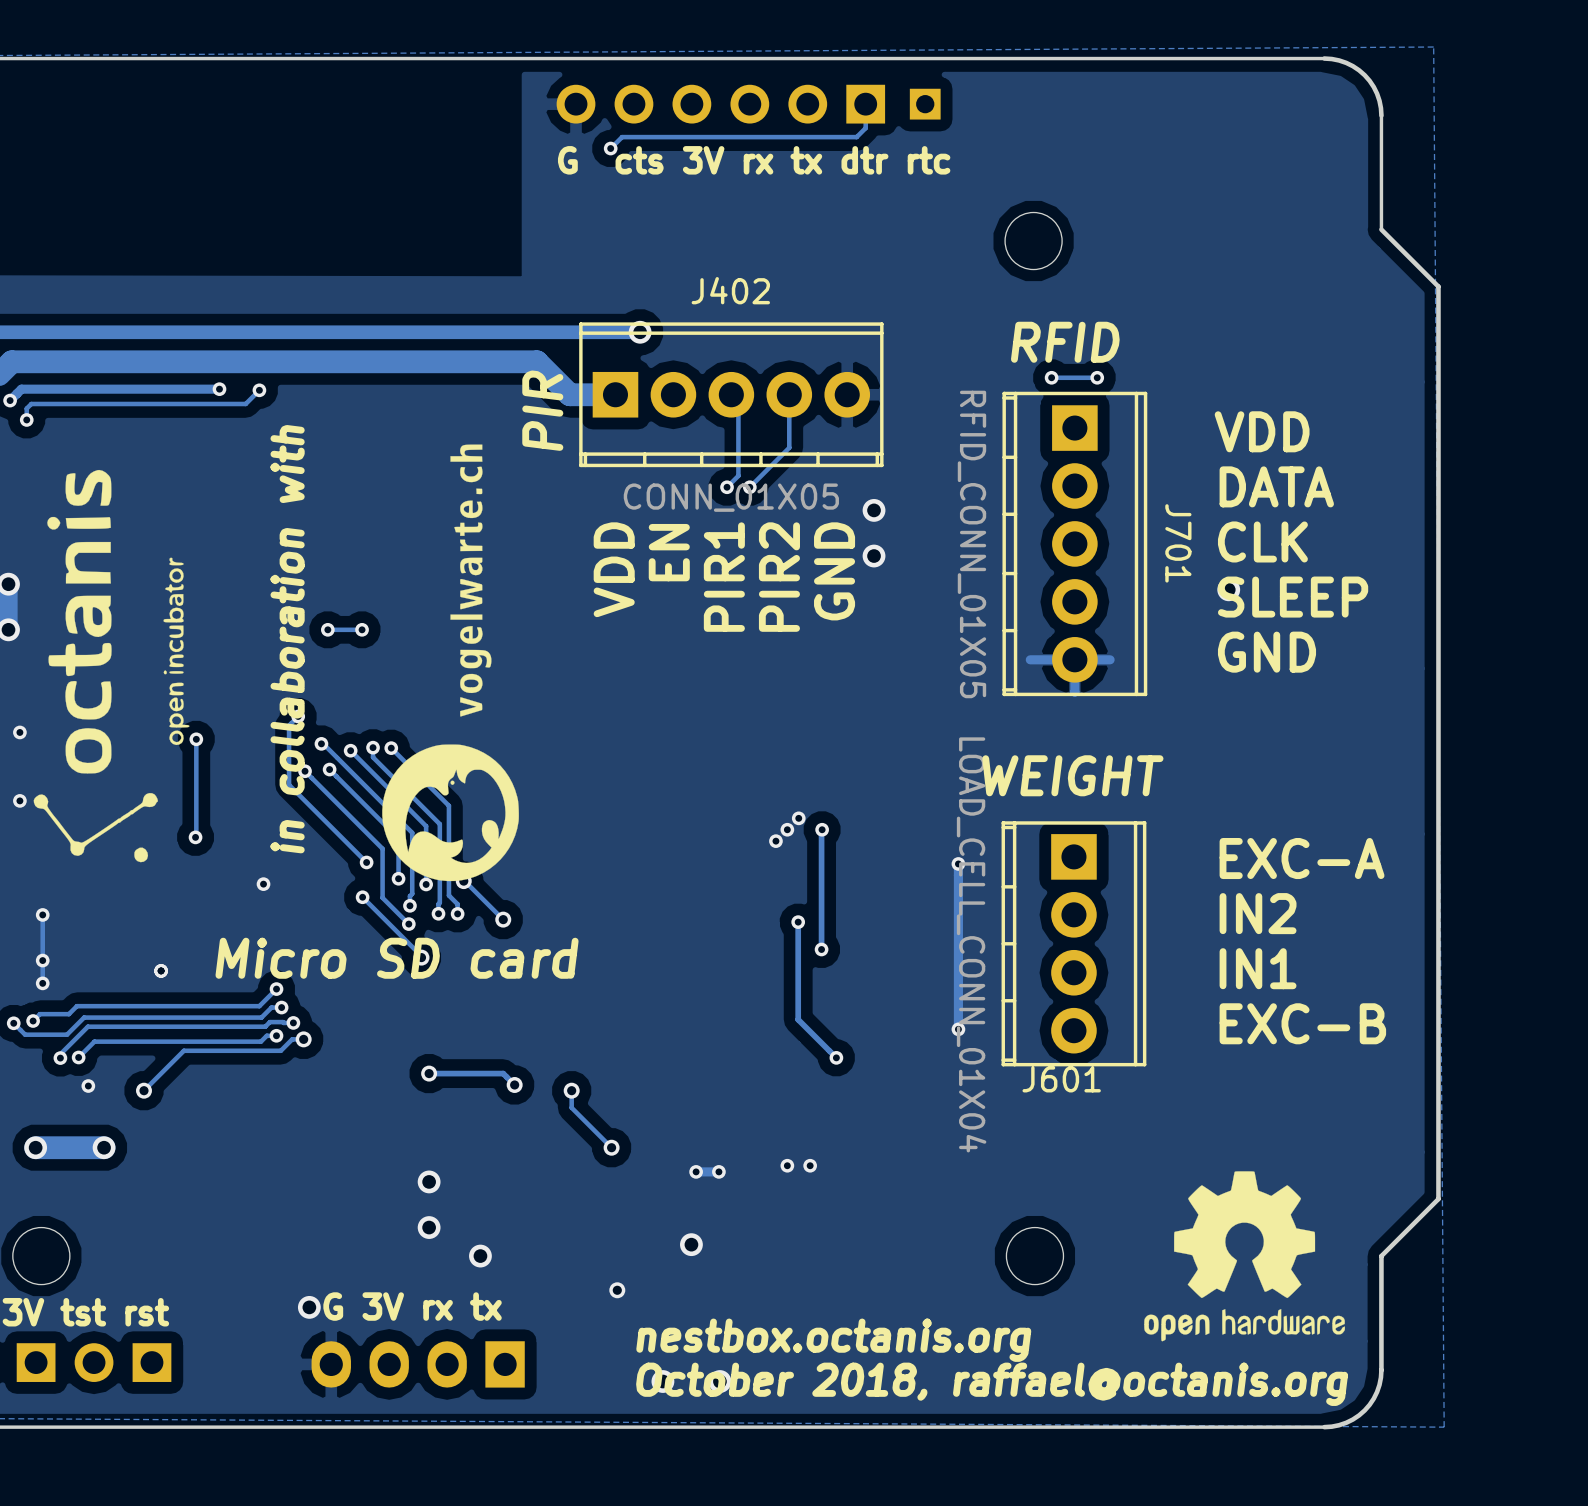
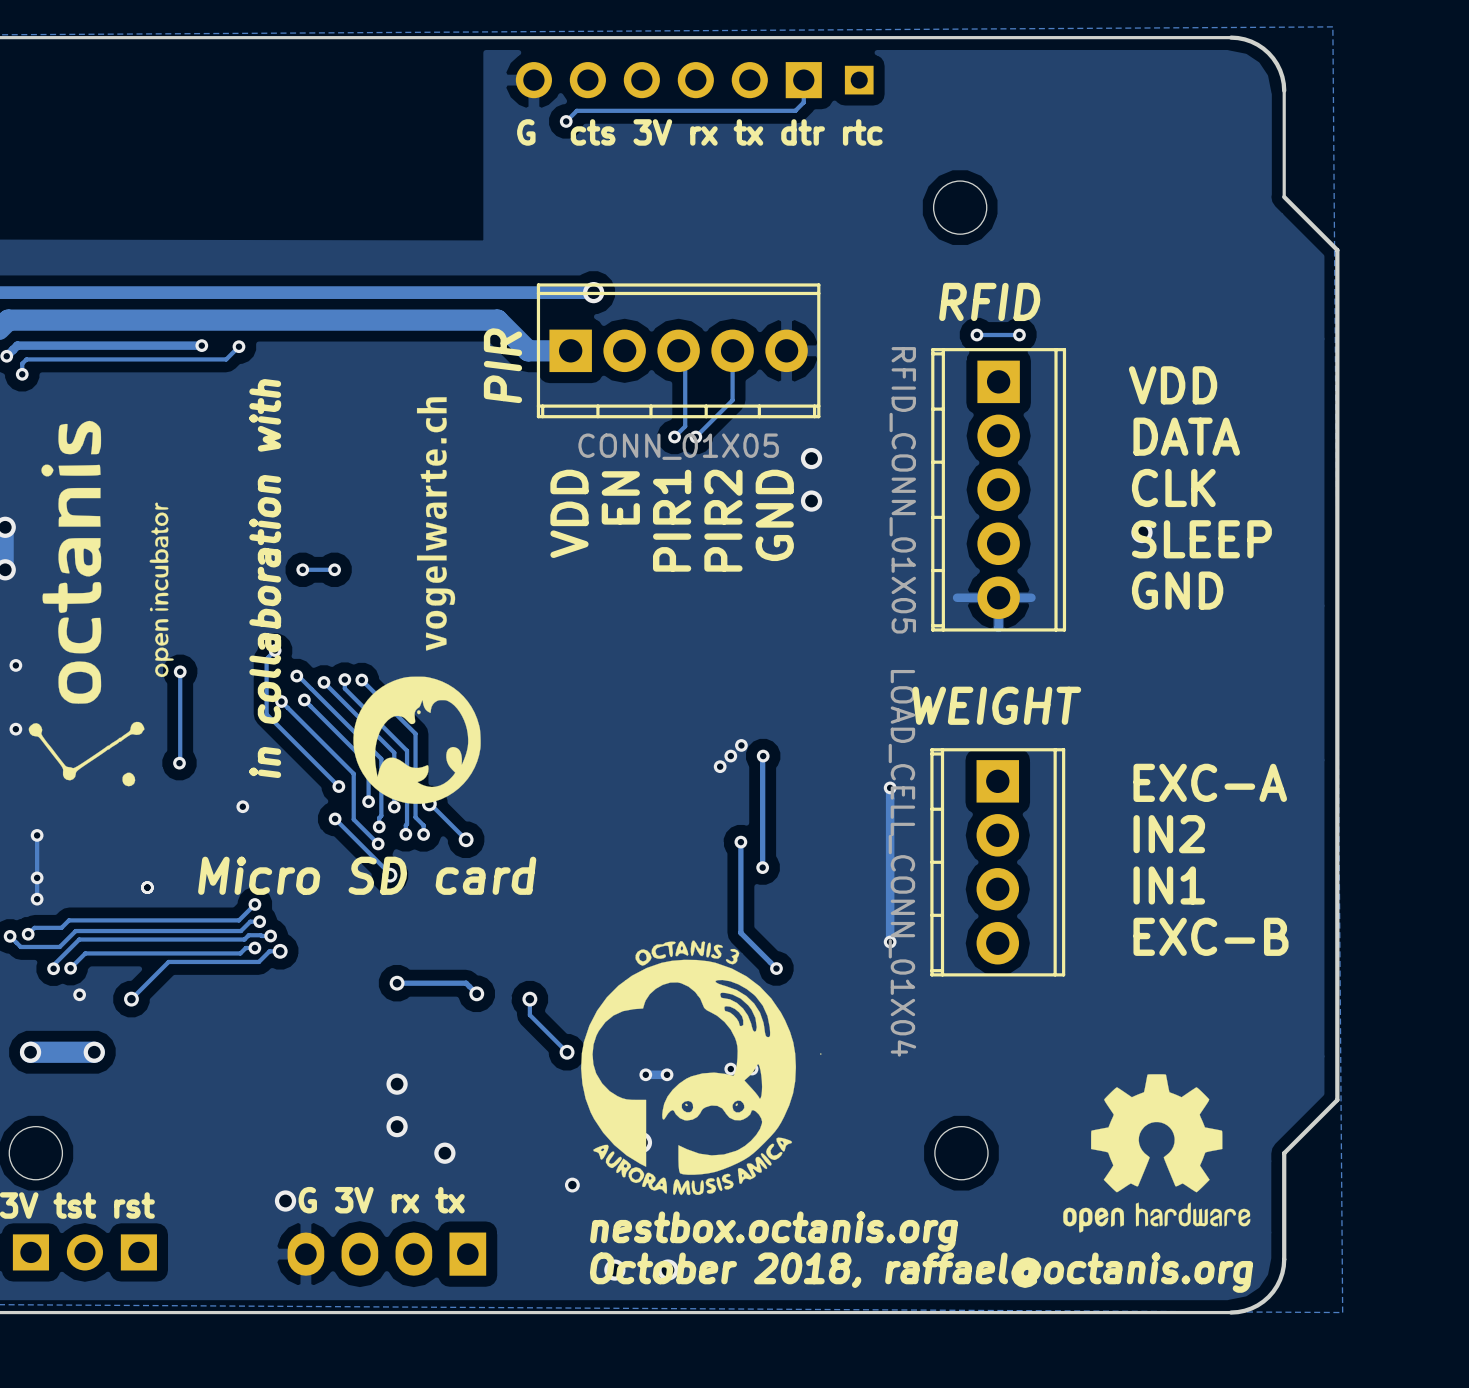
J402 name: J402 (730, 290) -> none
J701 name: J701 (1178, 543) -> none
drawing: none -> [581, 940, 822, 1196]
J601 name: J601 (1061, 1079) -> none

